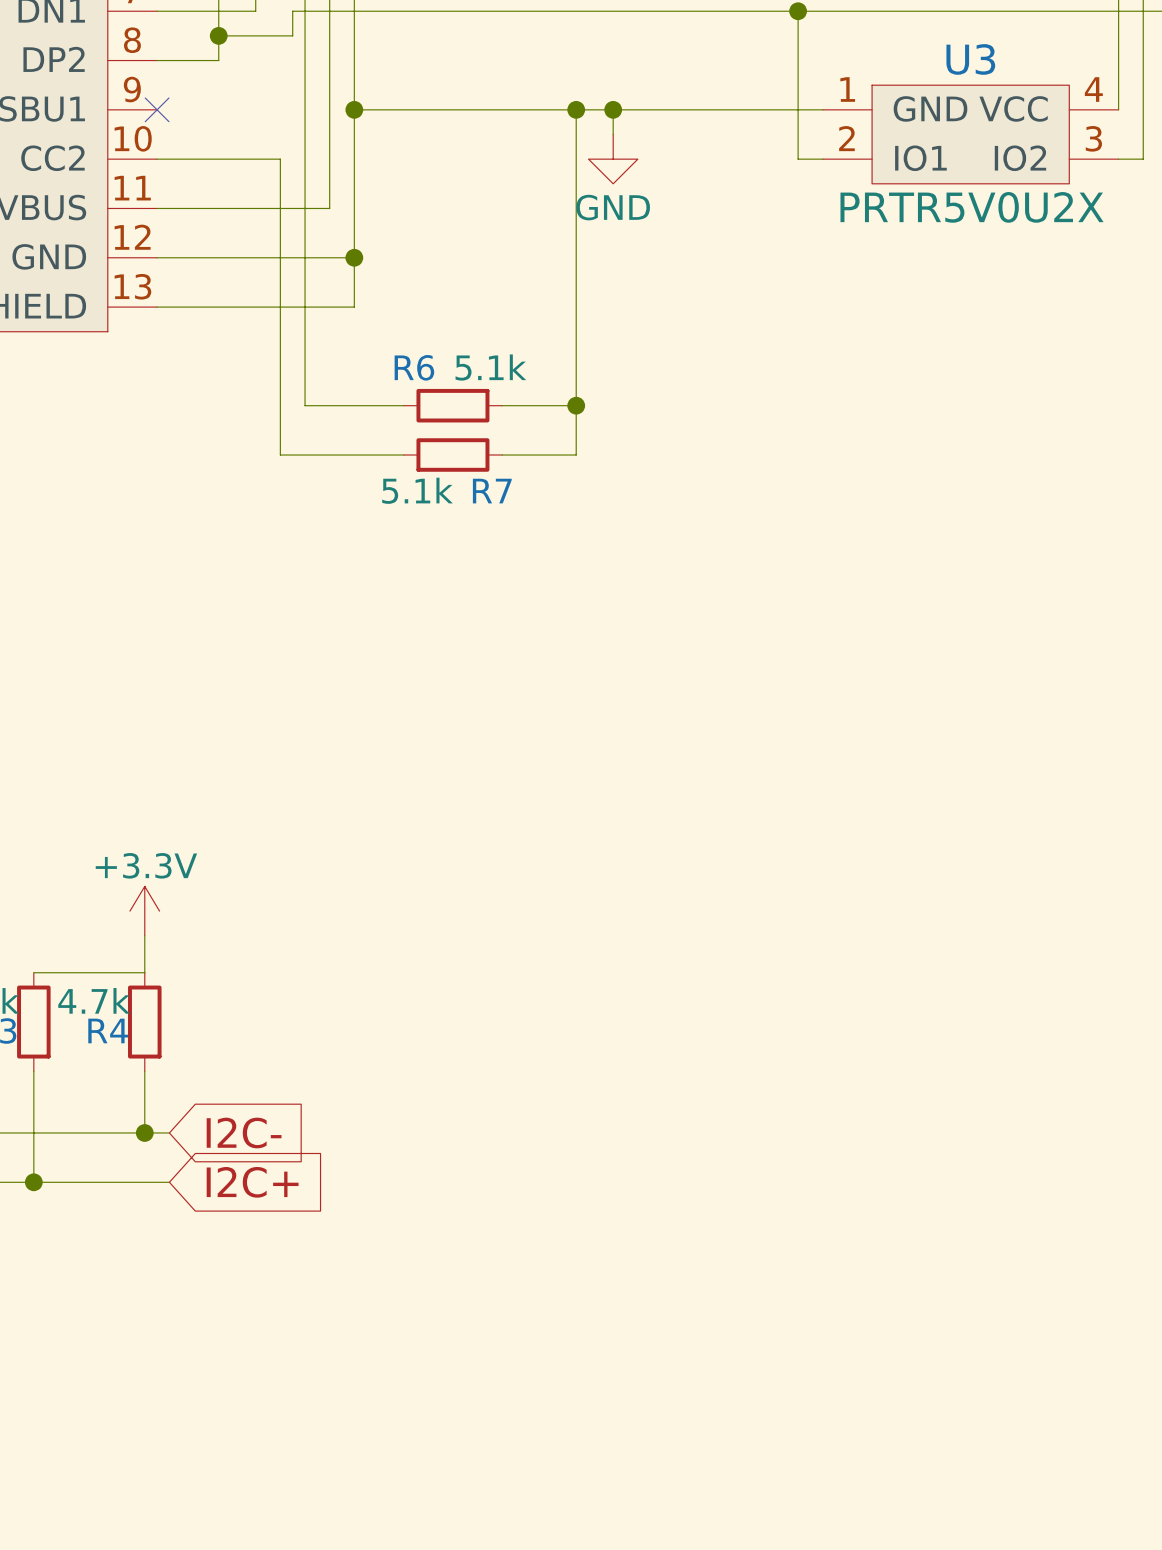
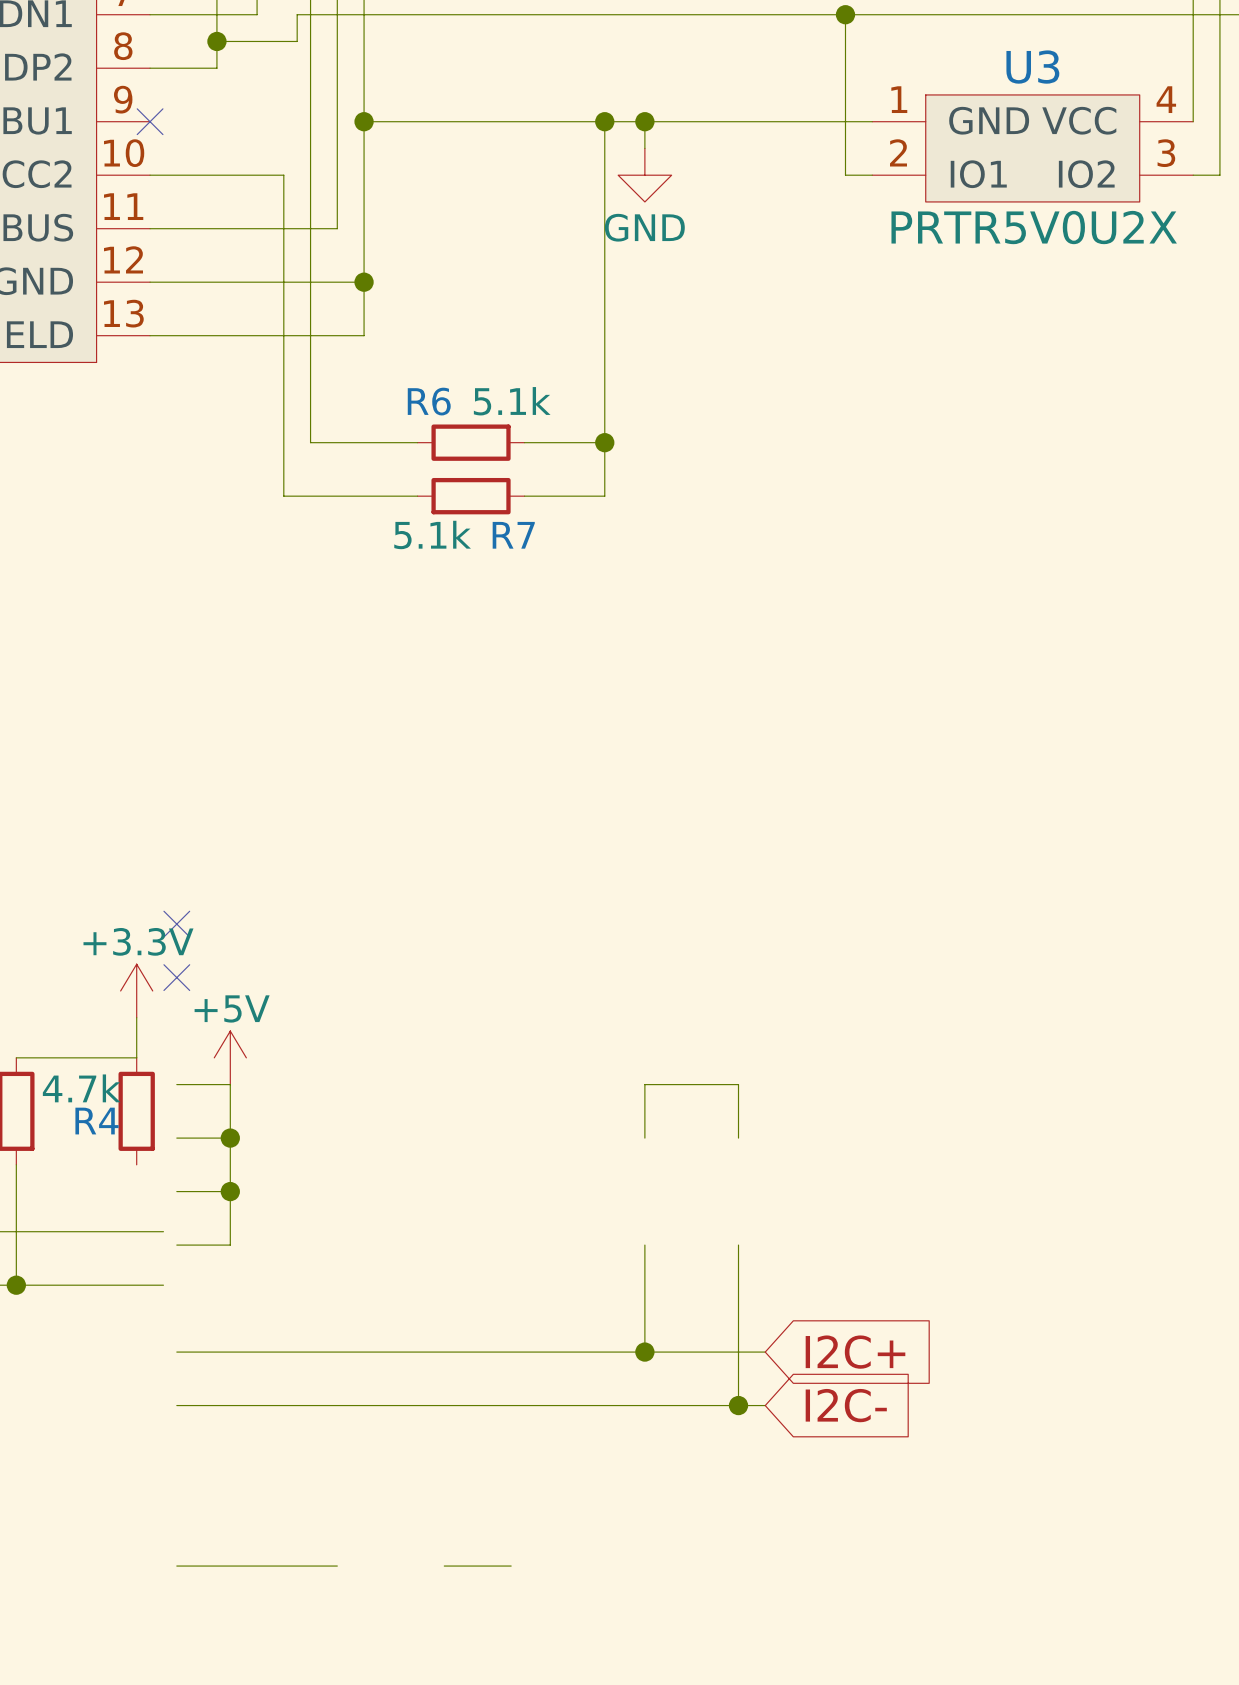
no-connect mark: none -> (176, 924)
no-connect mark: none -> (176, 977)
power symbol: none -> +5V (230, 1057)
wire: none -> (176, 1084) (230, 1084) (230, 1245) (176, 1245)
wire: none -> (176, 1138) (230, 1138)
junction: none -> (230, 1138)
wire: none -> (644, 1138) (644, 1084) (738, 1084) (738, 1138)
wire: (144, 1071) (144, 1132) -> none
wire: none -> (176, 1191) (230, 1191)
junction: none -> (230, 1191)
junction: (144, 1132) -> none
global label: I2C- (244, 1133) -> none
wire: none -> (644, 1245) (644, 1352)
wire: none -> (738, 1245) (738, 1405)
global label: I2C+ (252, 1182) -> none
wire: none -> (176, 1352) (765, 1352)
junction: none -> (644, 1352)
global label: none -> I2C+ (855, 1352)
wire: none -> (176, 1405) (765, 1405)
junction: none -> (738, 1405)
global label: none -> I2C- (846, 1405)
wire: none -> (176, 1566) (337, 1566)
wire: none -> (444, 1566) (511, 1566)

